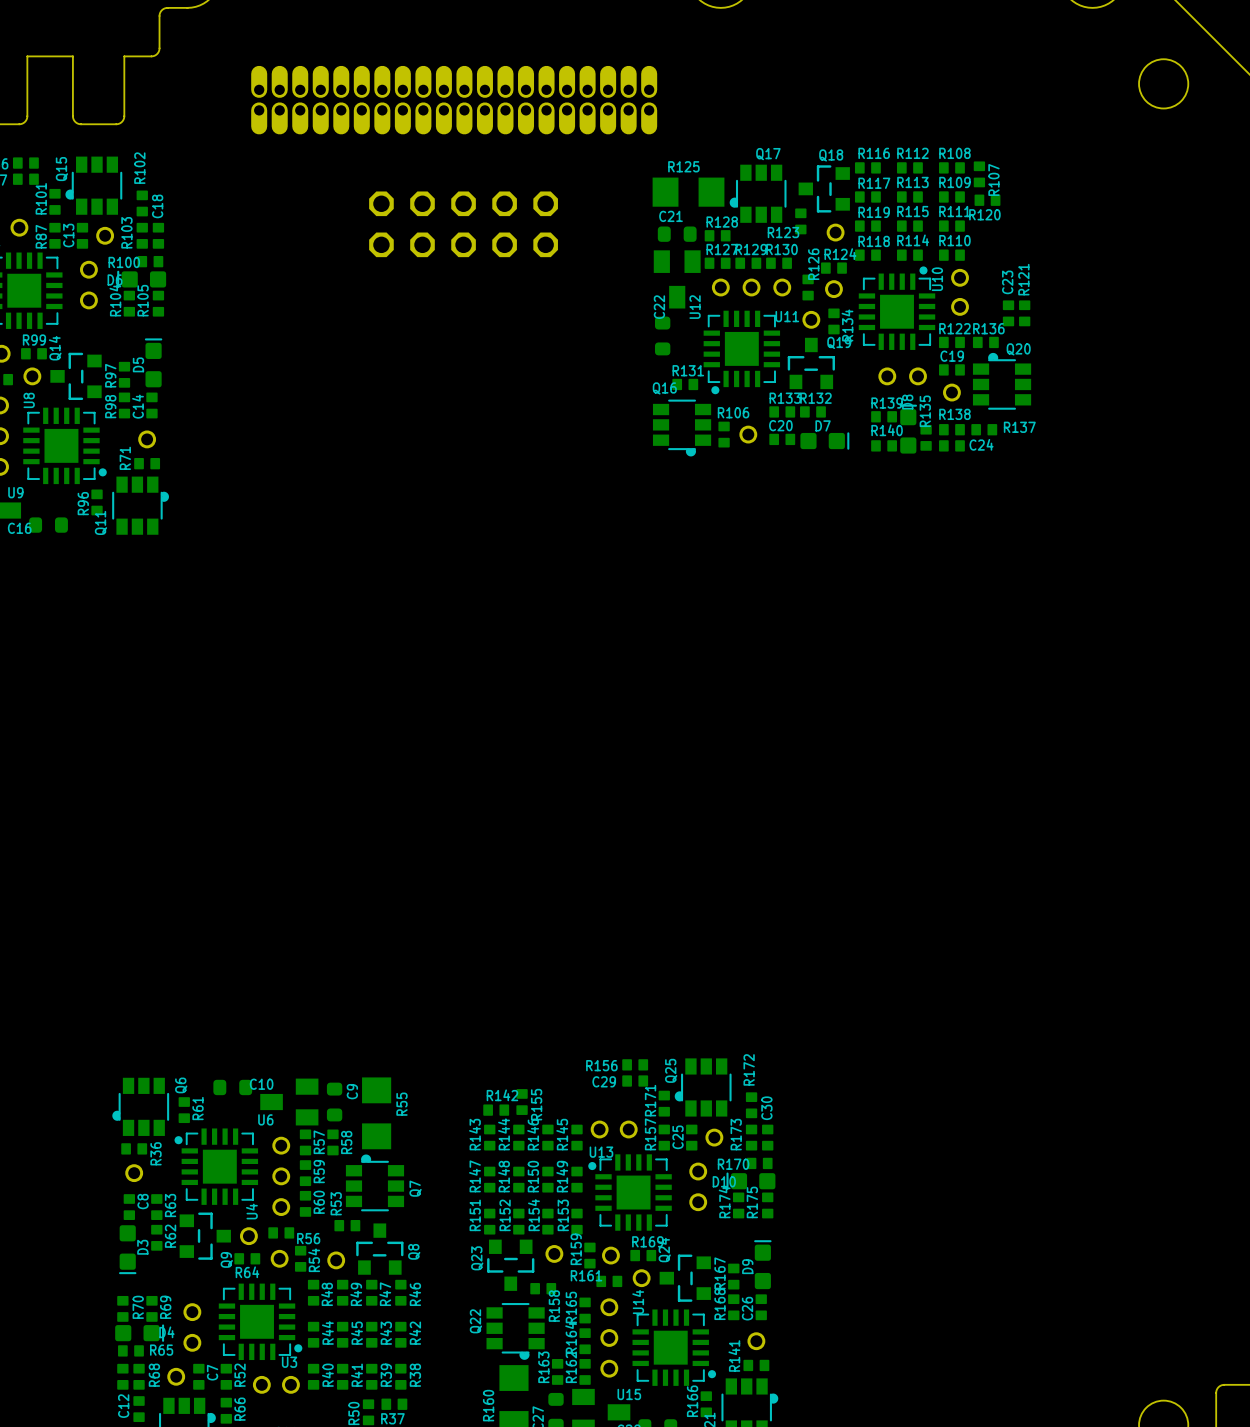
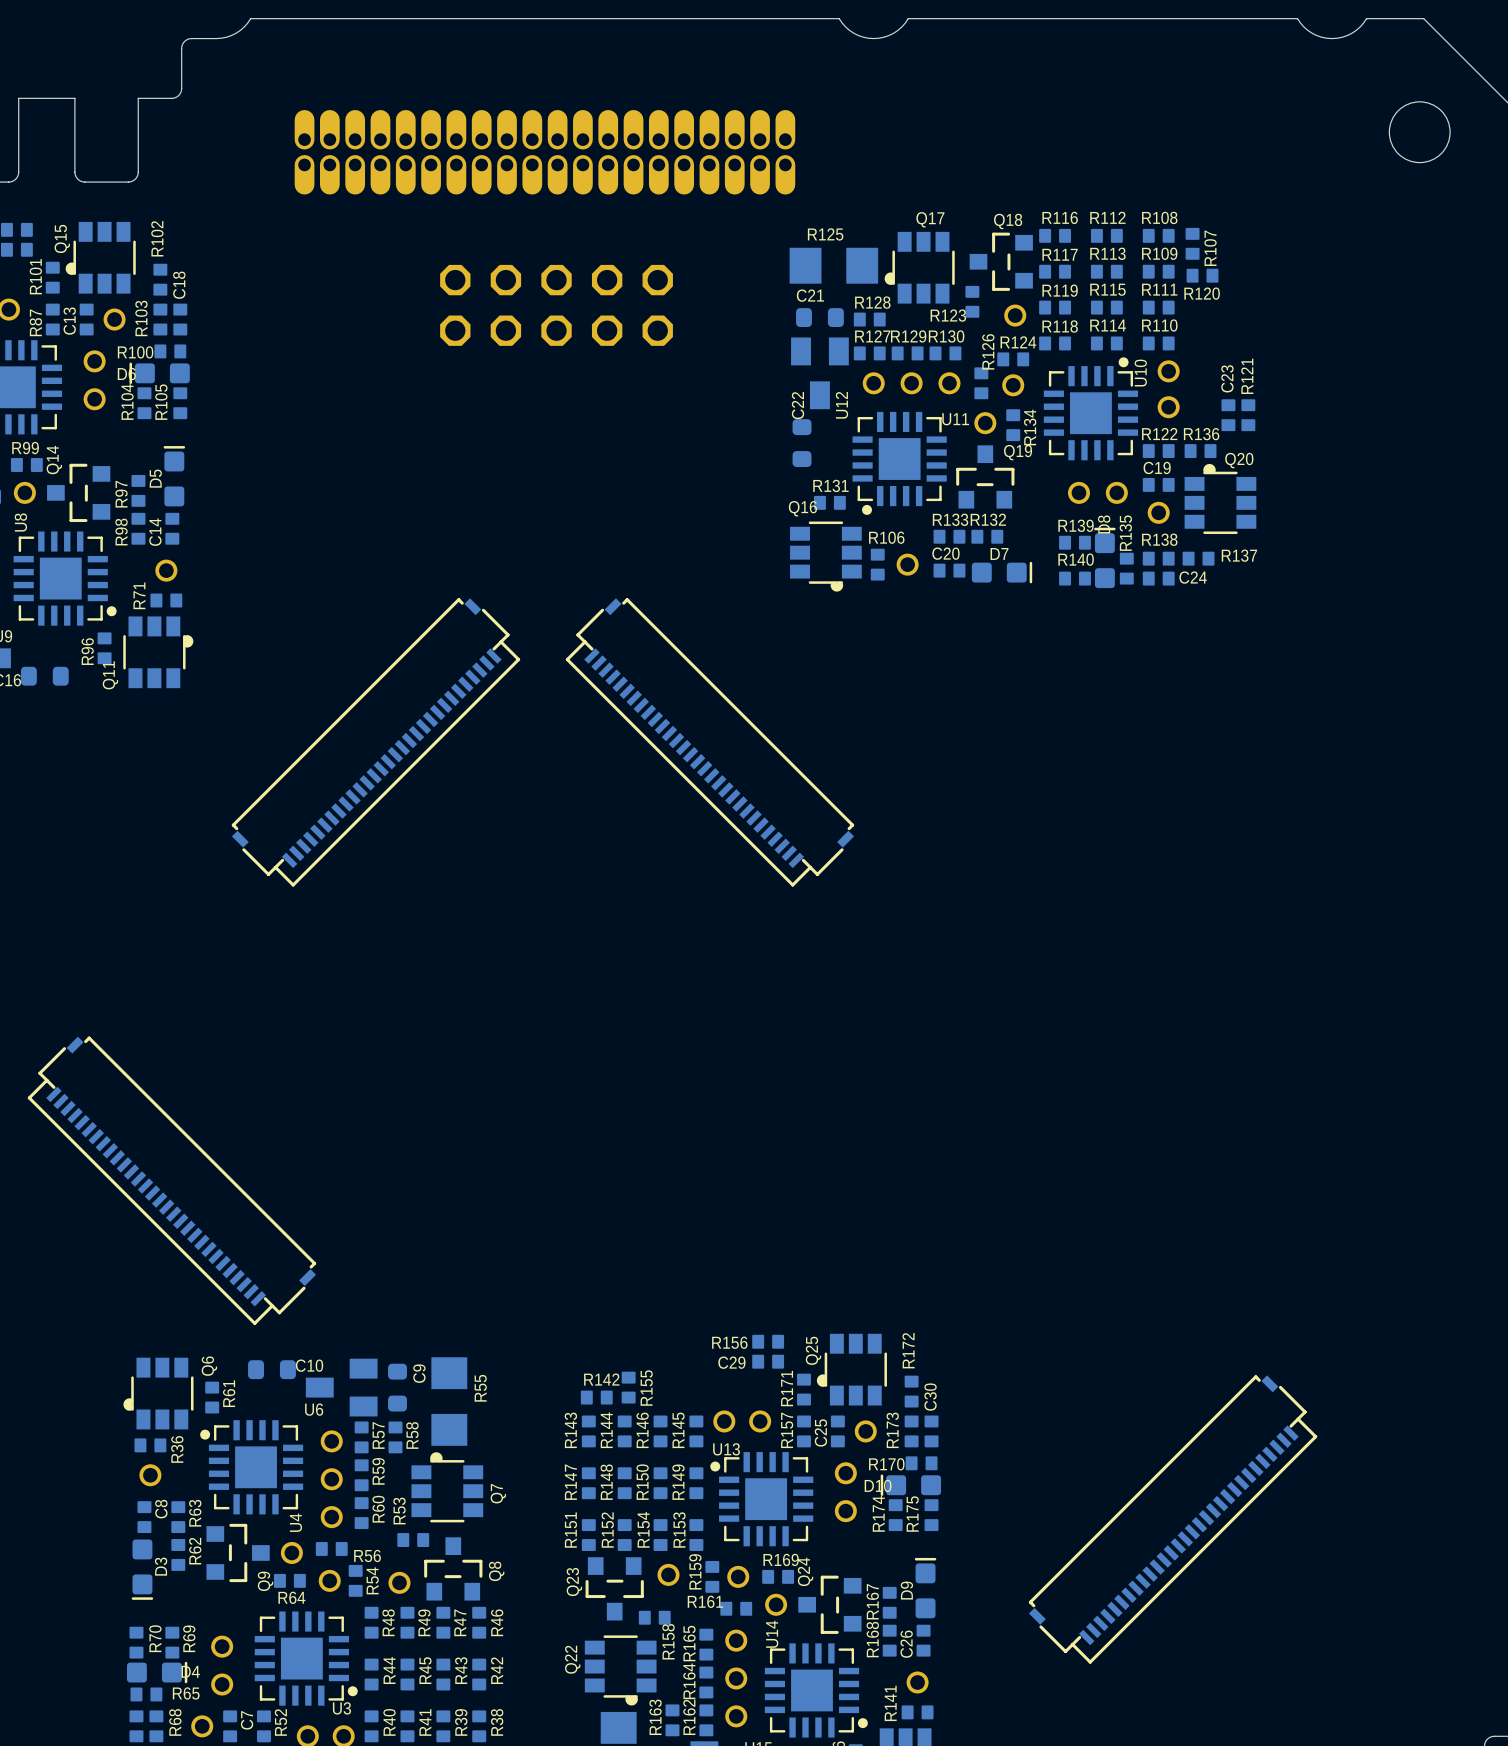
part: none -> (375, 742)
part: none -> (709, 742)
part: none -> (171, 1180)
part: none -> (1173, 1519)

